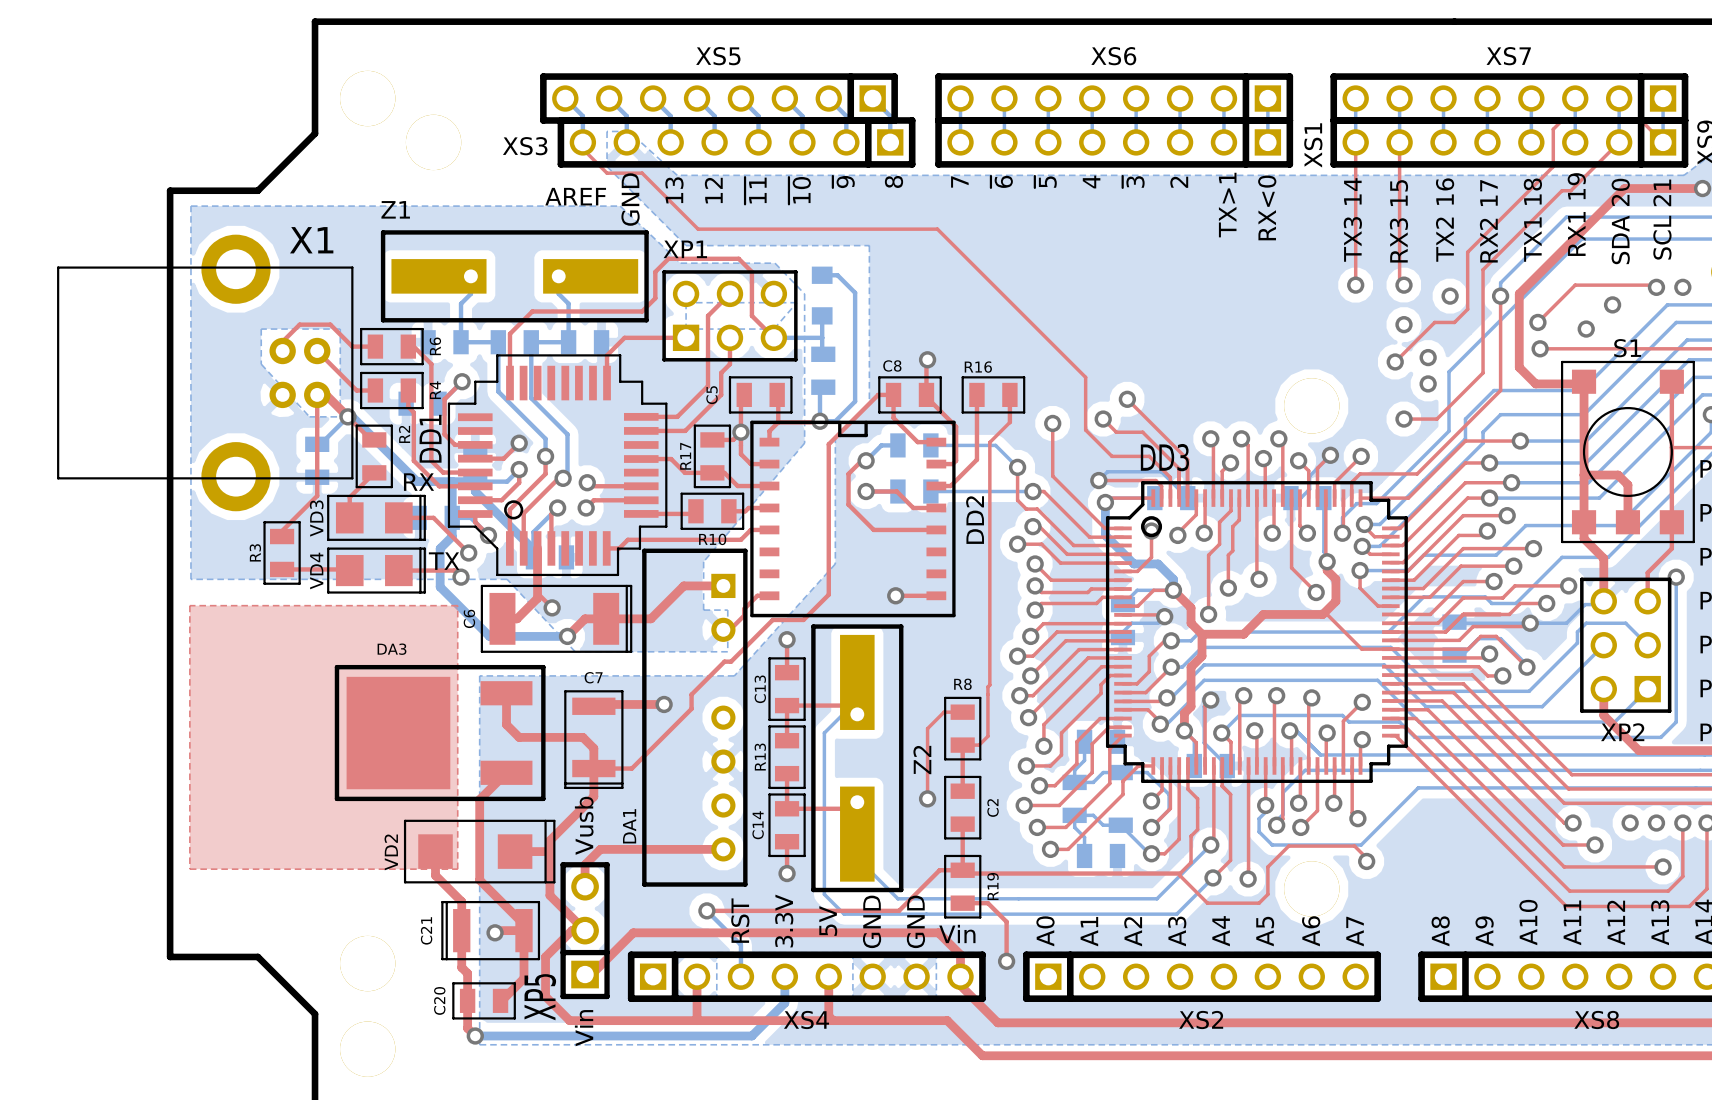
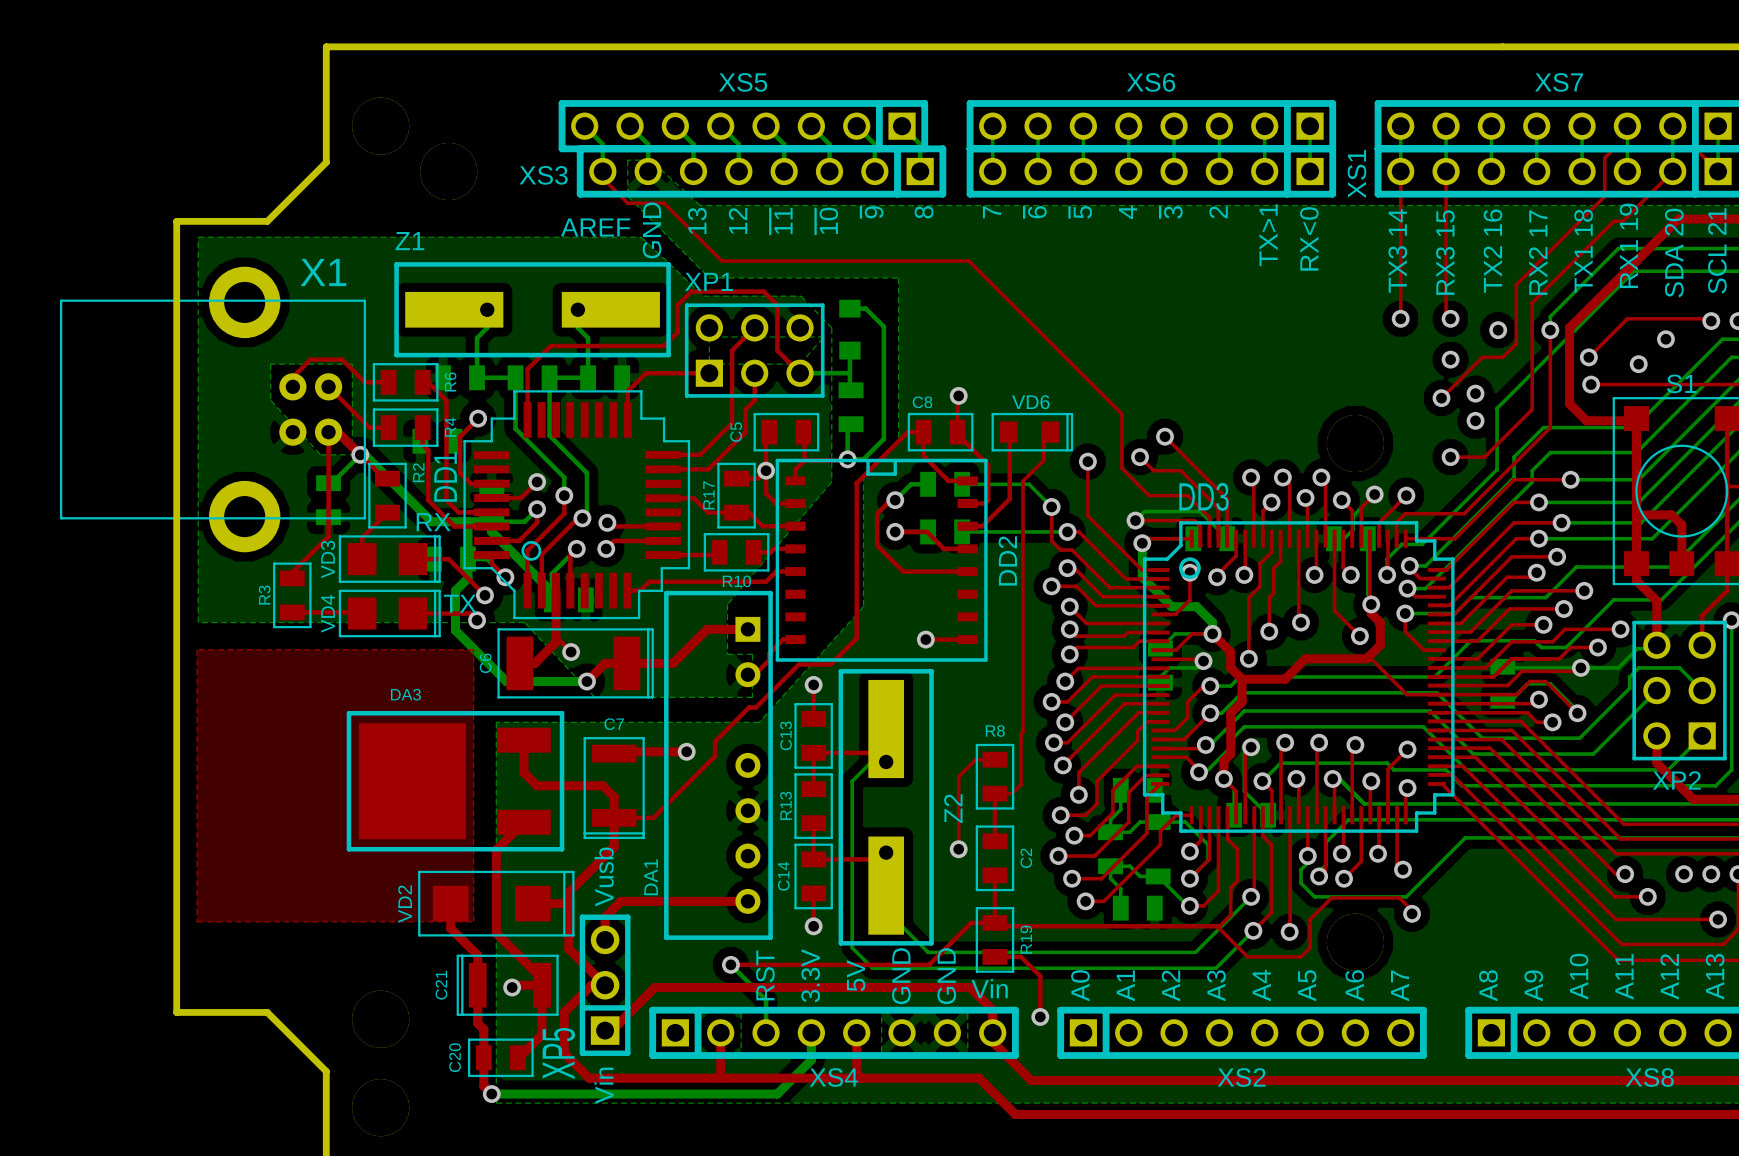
R16: (993, 394) -> none
VD6: none -> (1032, 432)

